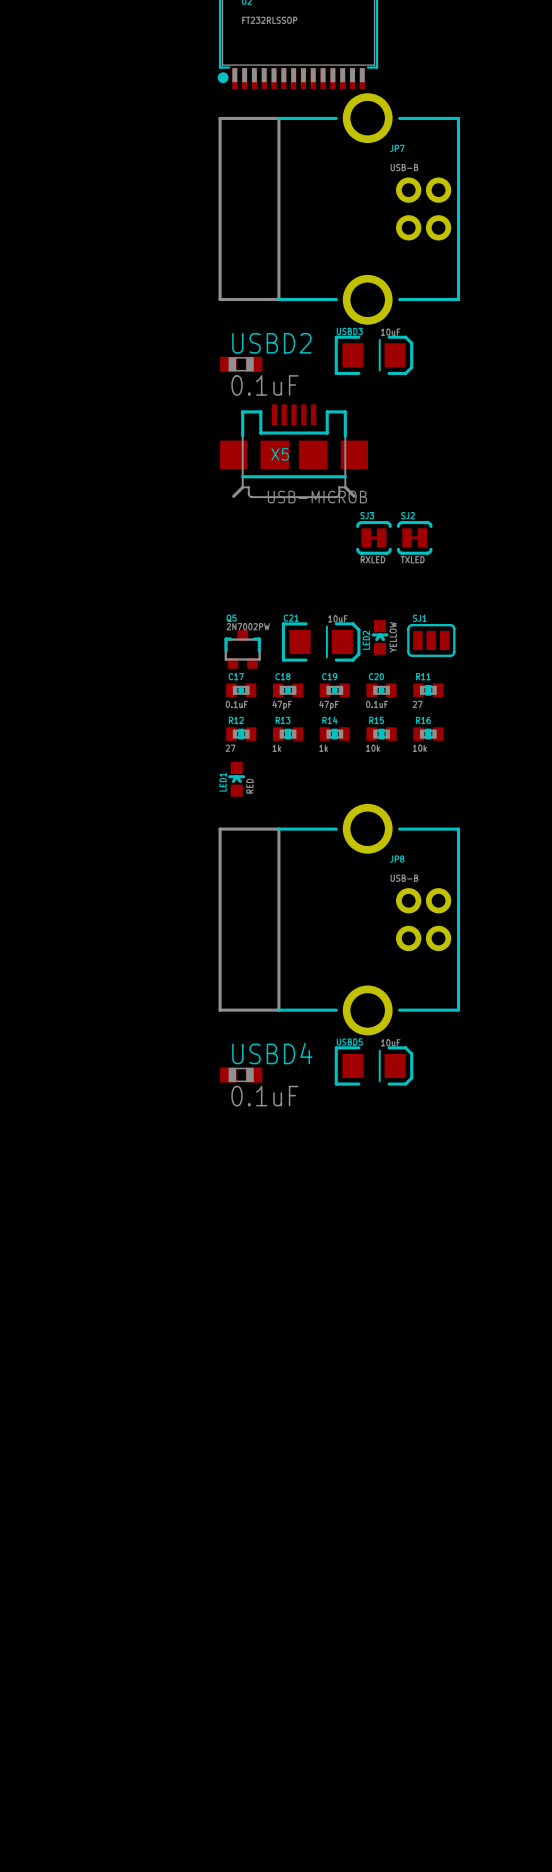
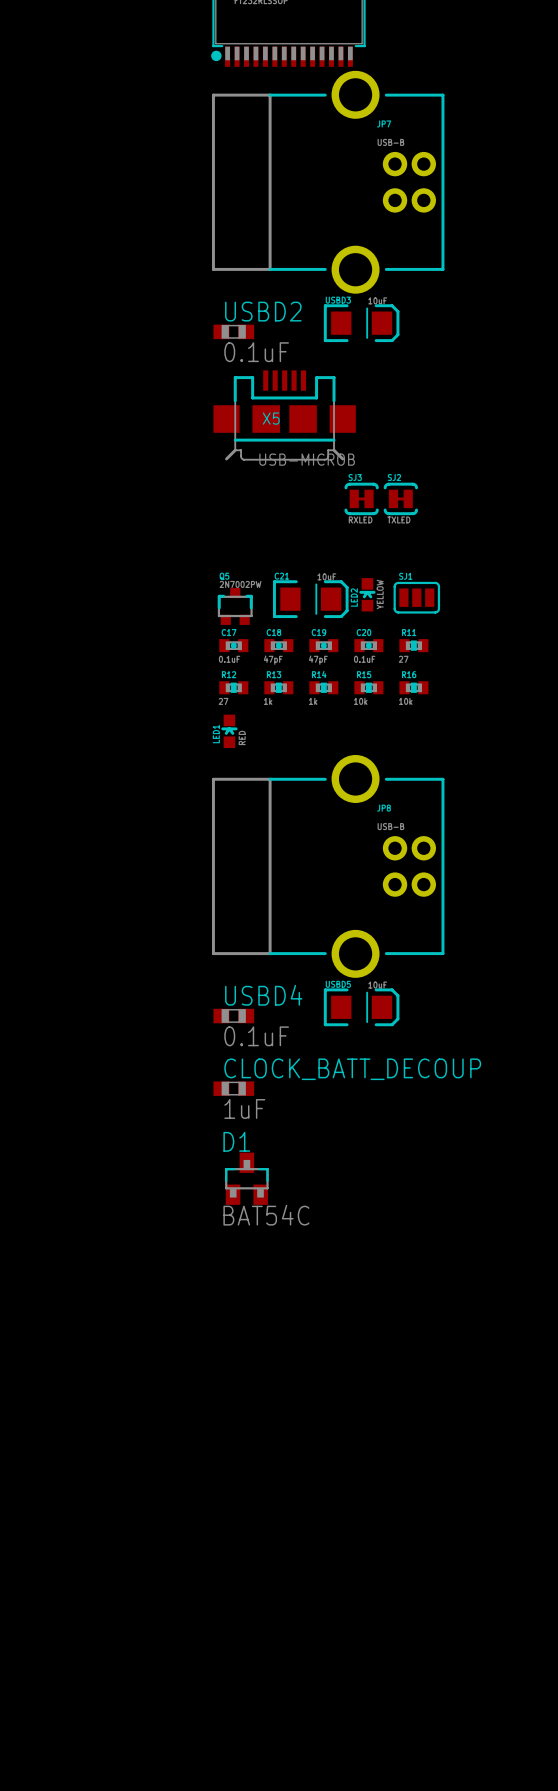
CLOCK_BATT_DECOUP: none -> 1uF (233, 1088)
D1: none -> BAT54C (246, 1178)

